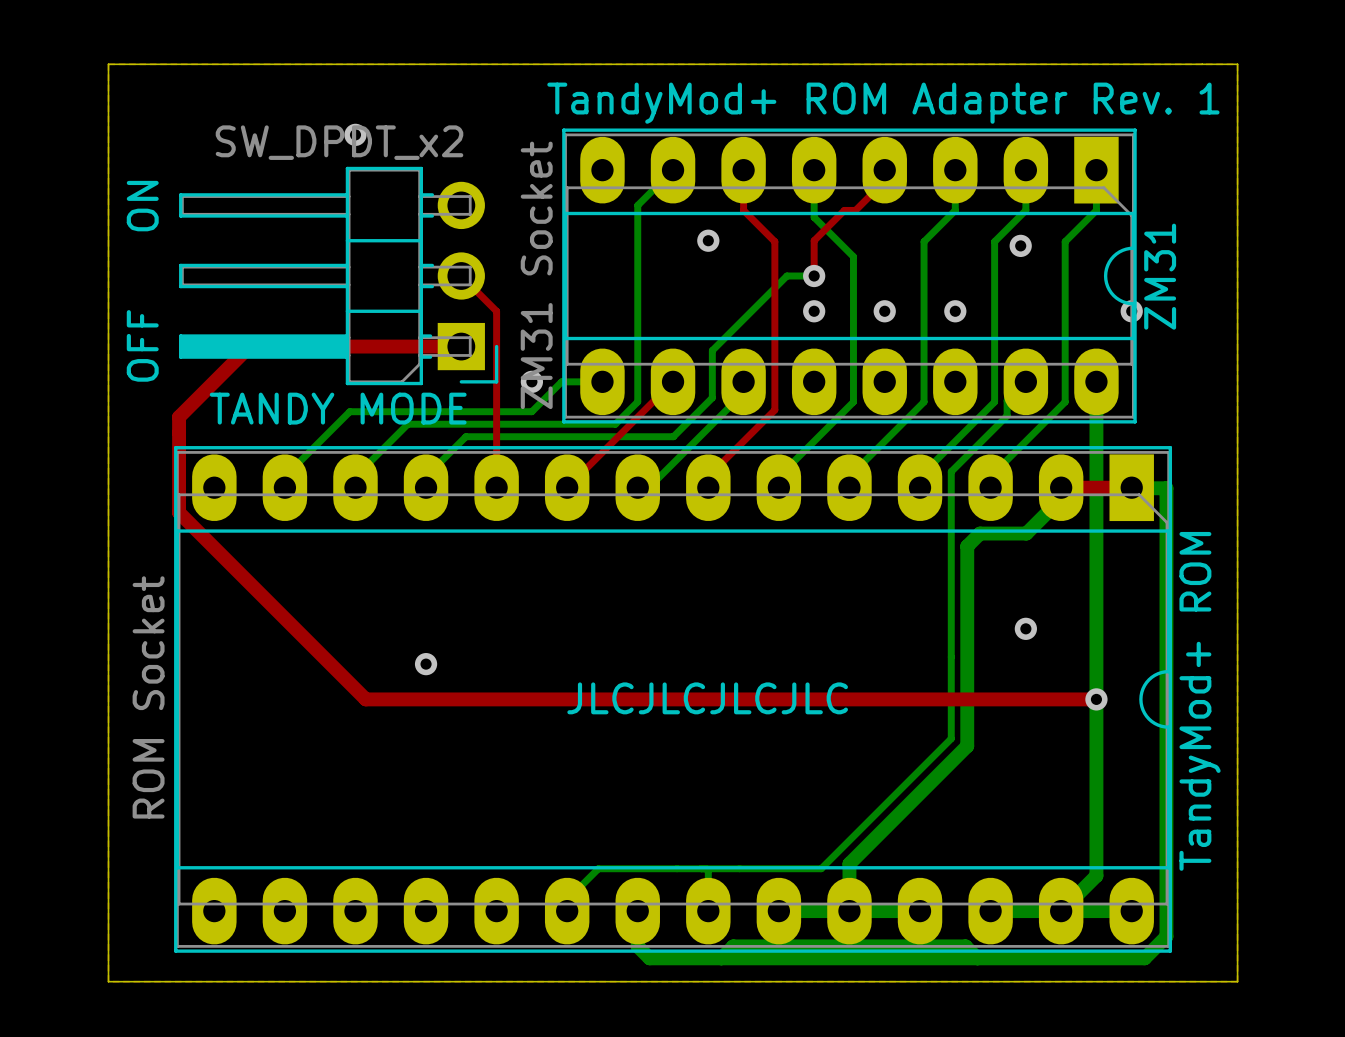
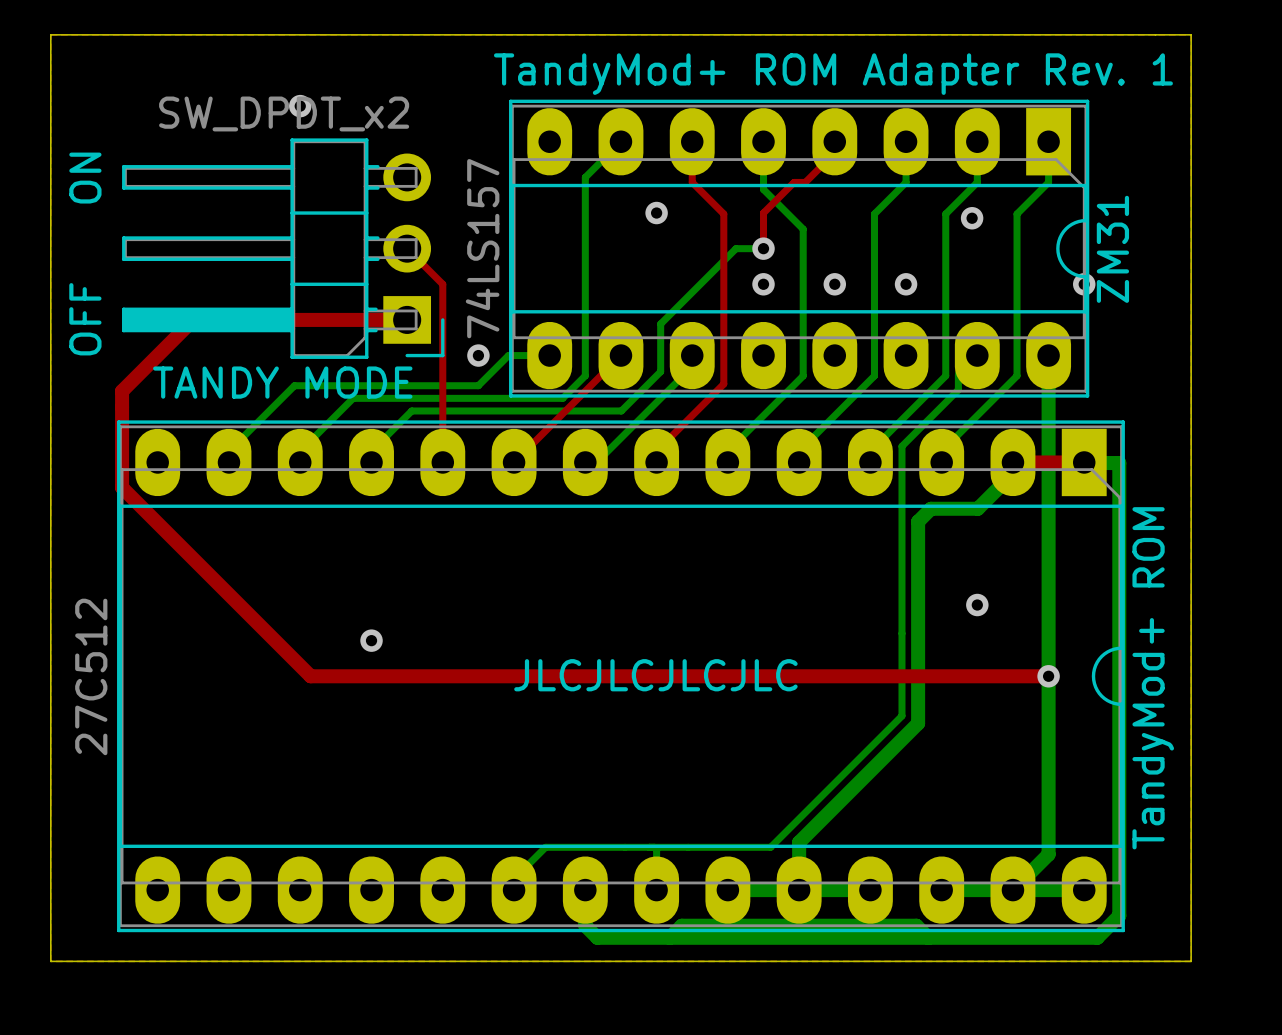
ZM31 value: ZM31 Socket (536, 275) -> 74LS157 (482, 248)
TandyMod+ ROM value: ROM Socket (148, 697) -> 27C512 (91, 676)

